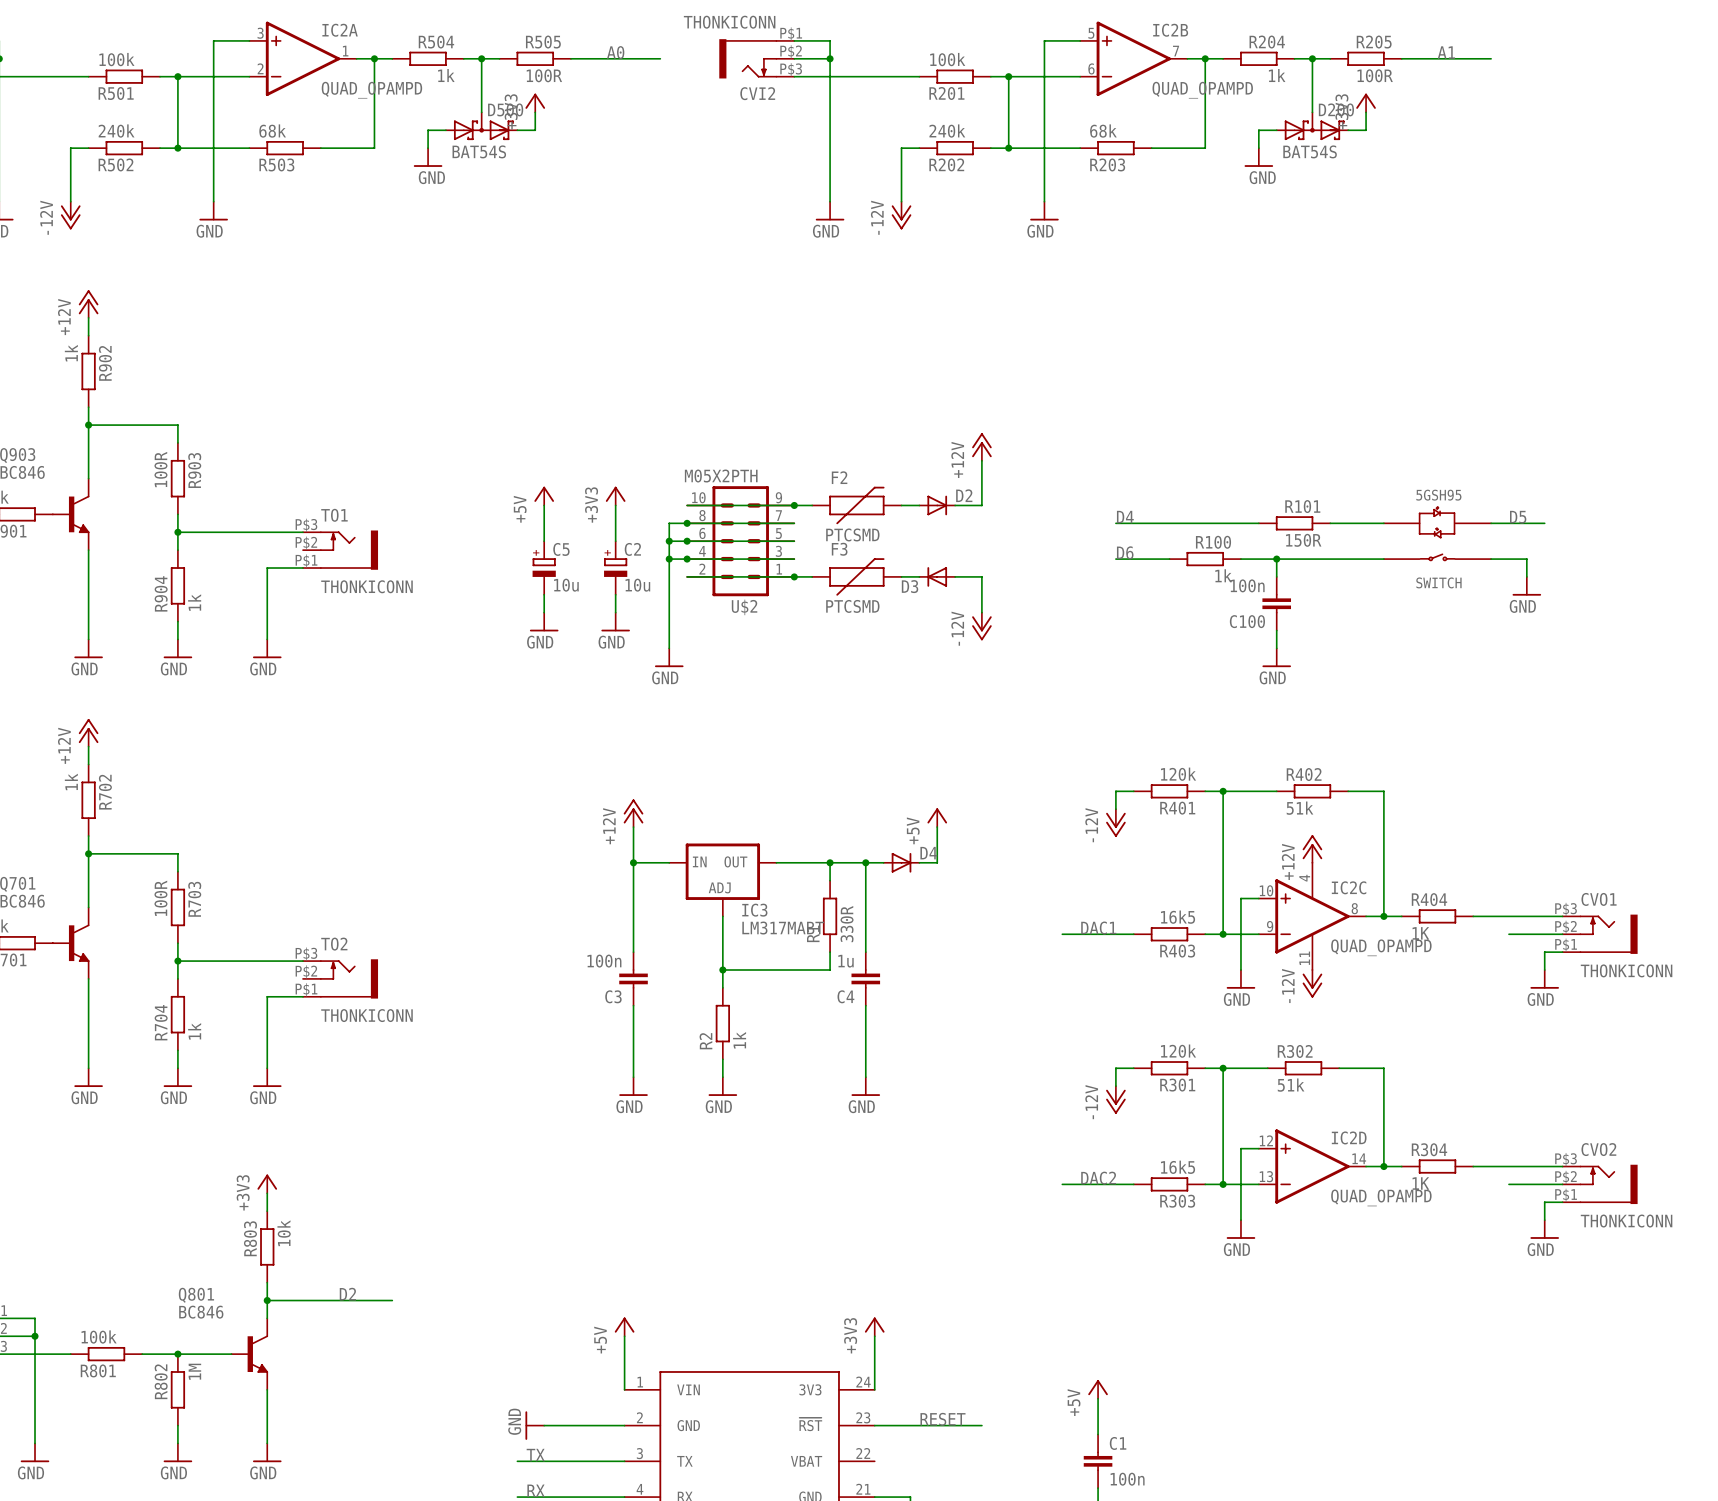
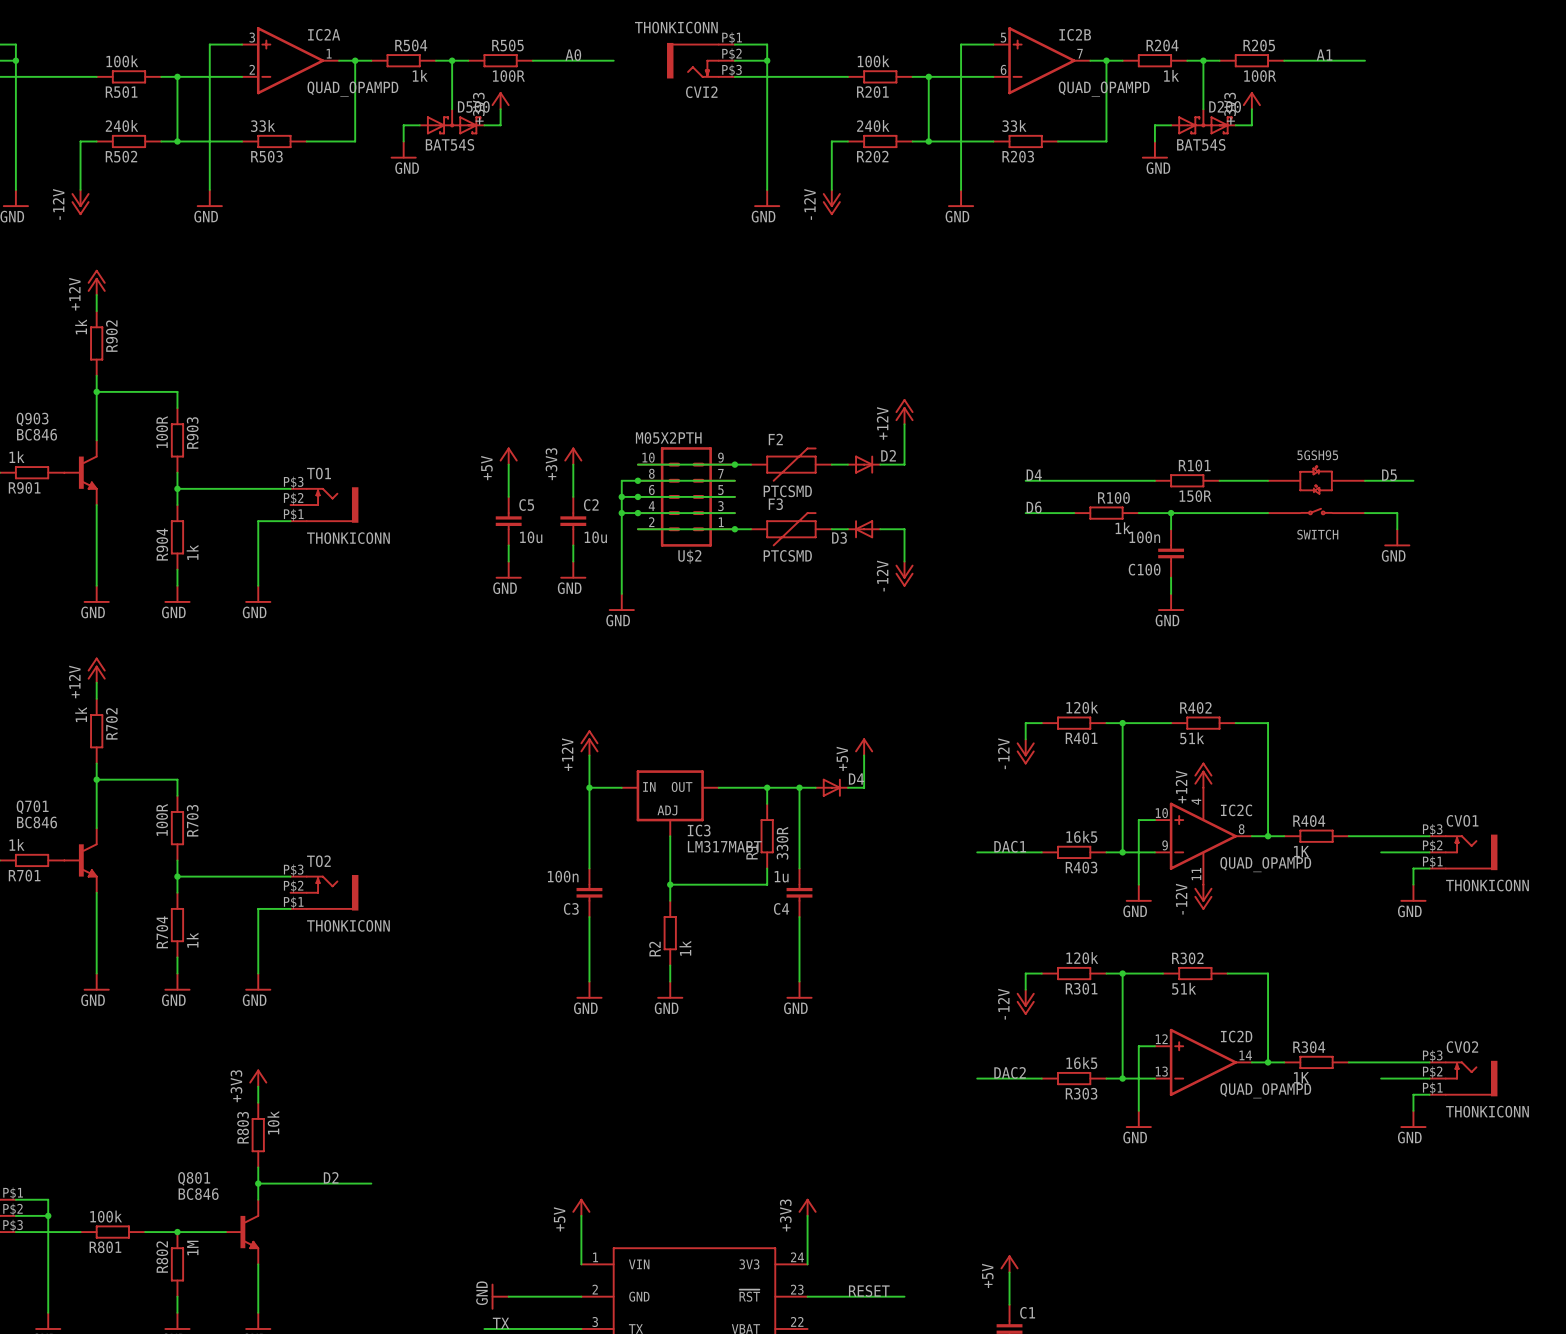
R503 value: 68k (272, 131) -> 33k (263, 126)
R203 value: 68k (1103, 131) -> 33k (1014, 126)
C5 symbol: [532, 541, 556, 595] -> [495, 496, 522, 546]
C2 symbol: [604, 541, 628, 595] -> [560, 496, 587, 546]

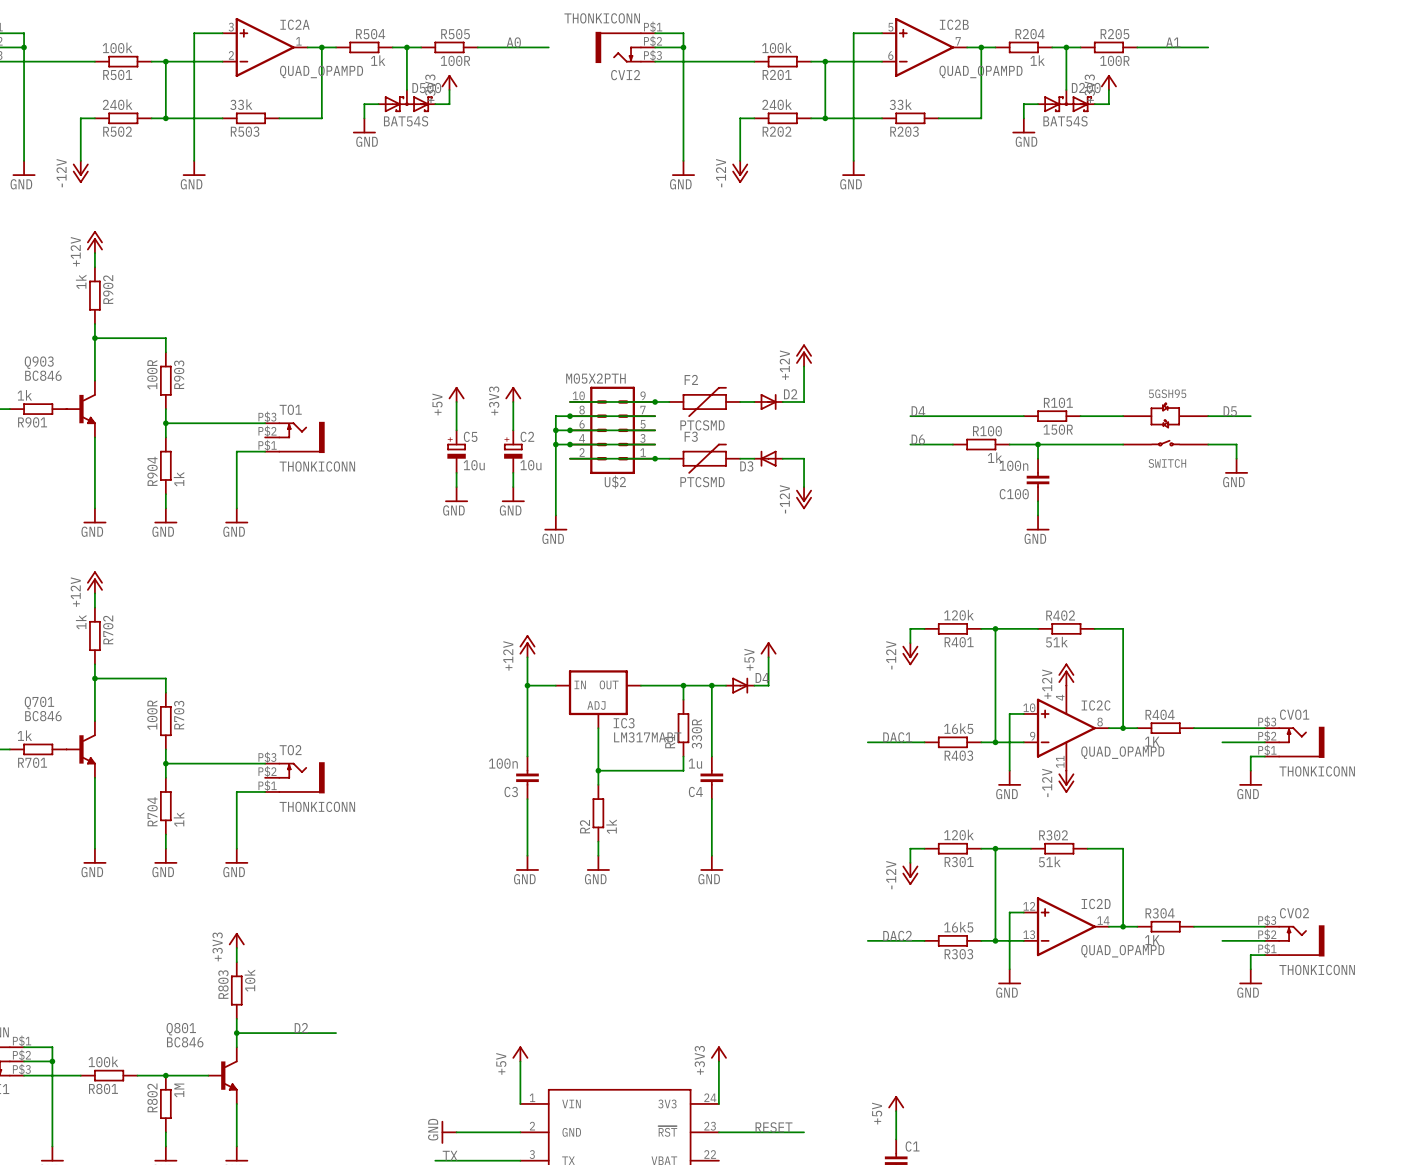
C5 symbol: [495, 496, 522, 546] -> [447, 430, 466, 473]
C2 symbol: [560, 496, 587, 546] -> [504, 430, 523, 473]

